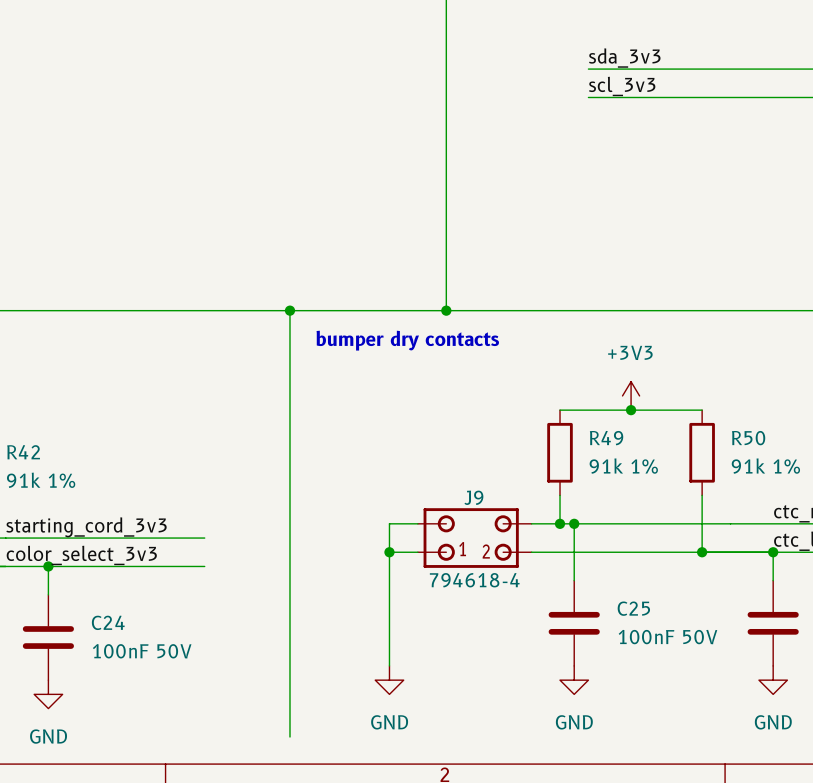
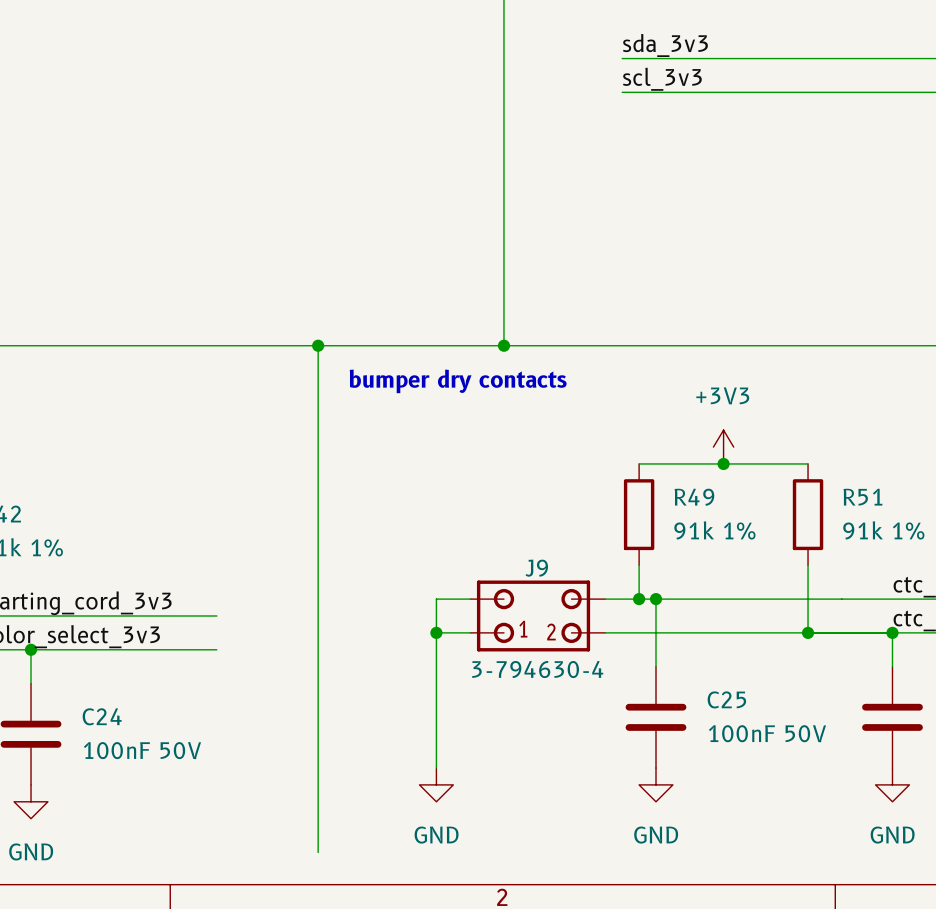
label position: sda_3v3 (624, 58) -> sda_3v3 (665, 45)
wire: none -> (622, 58) (672, 58)
label position: scl_3v3 (622, 86) -> scl_3v3 (662, 79)
wire: none -> (622, 92) (672, 92)
R50 name: R50 (748, 438) -> R51 (862, 497)
J9 value: 794618-4 (474, 580) -> 3-794630-4 (537, 669)

